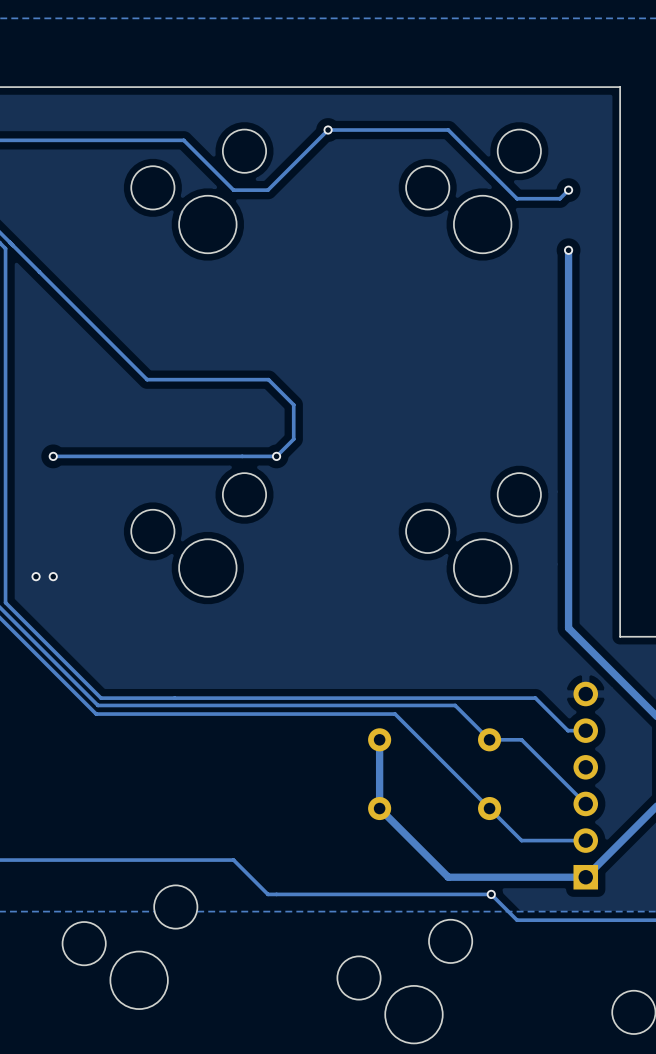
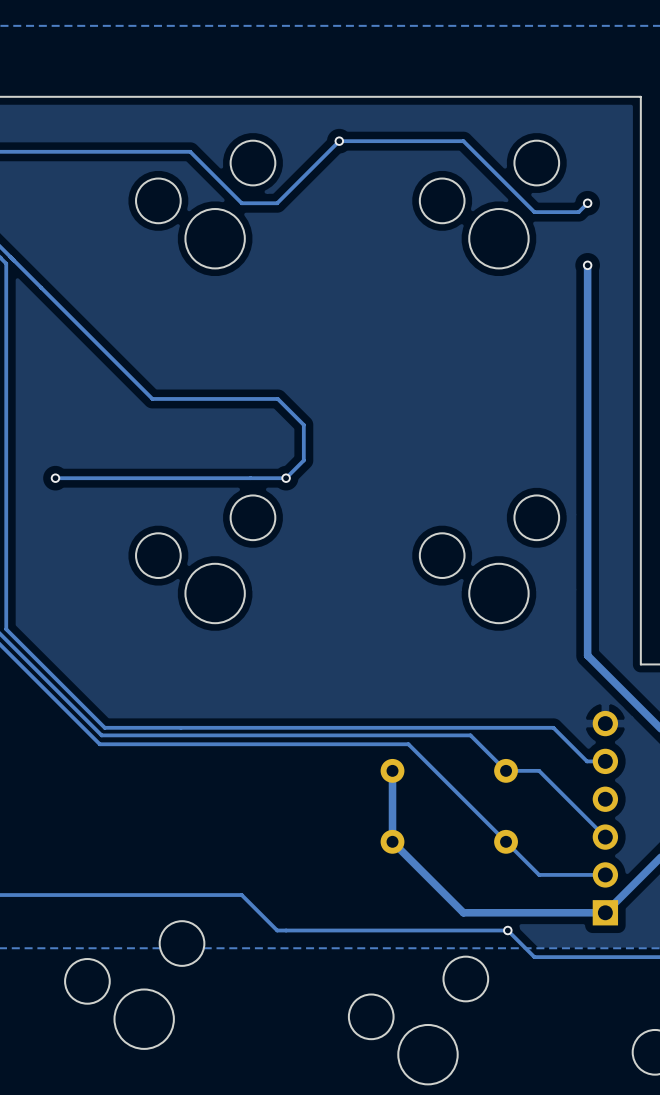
via: (36, 576) -> none
via: (53, 576) -> none

